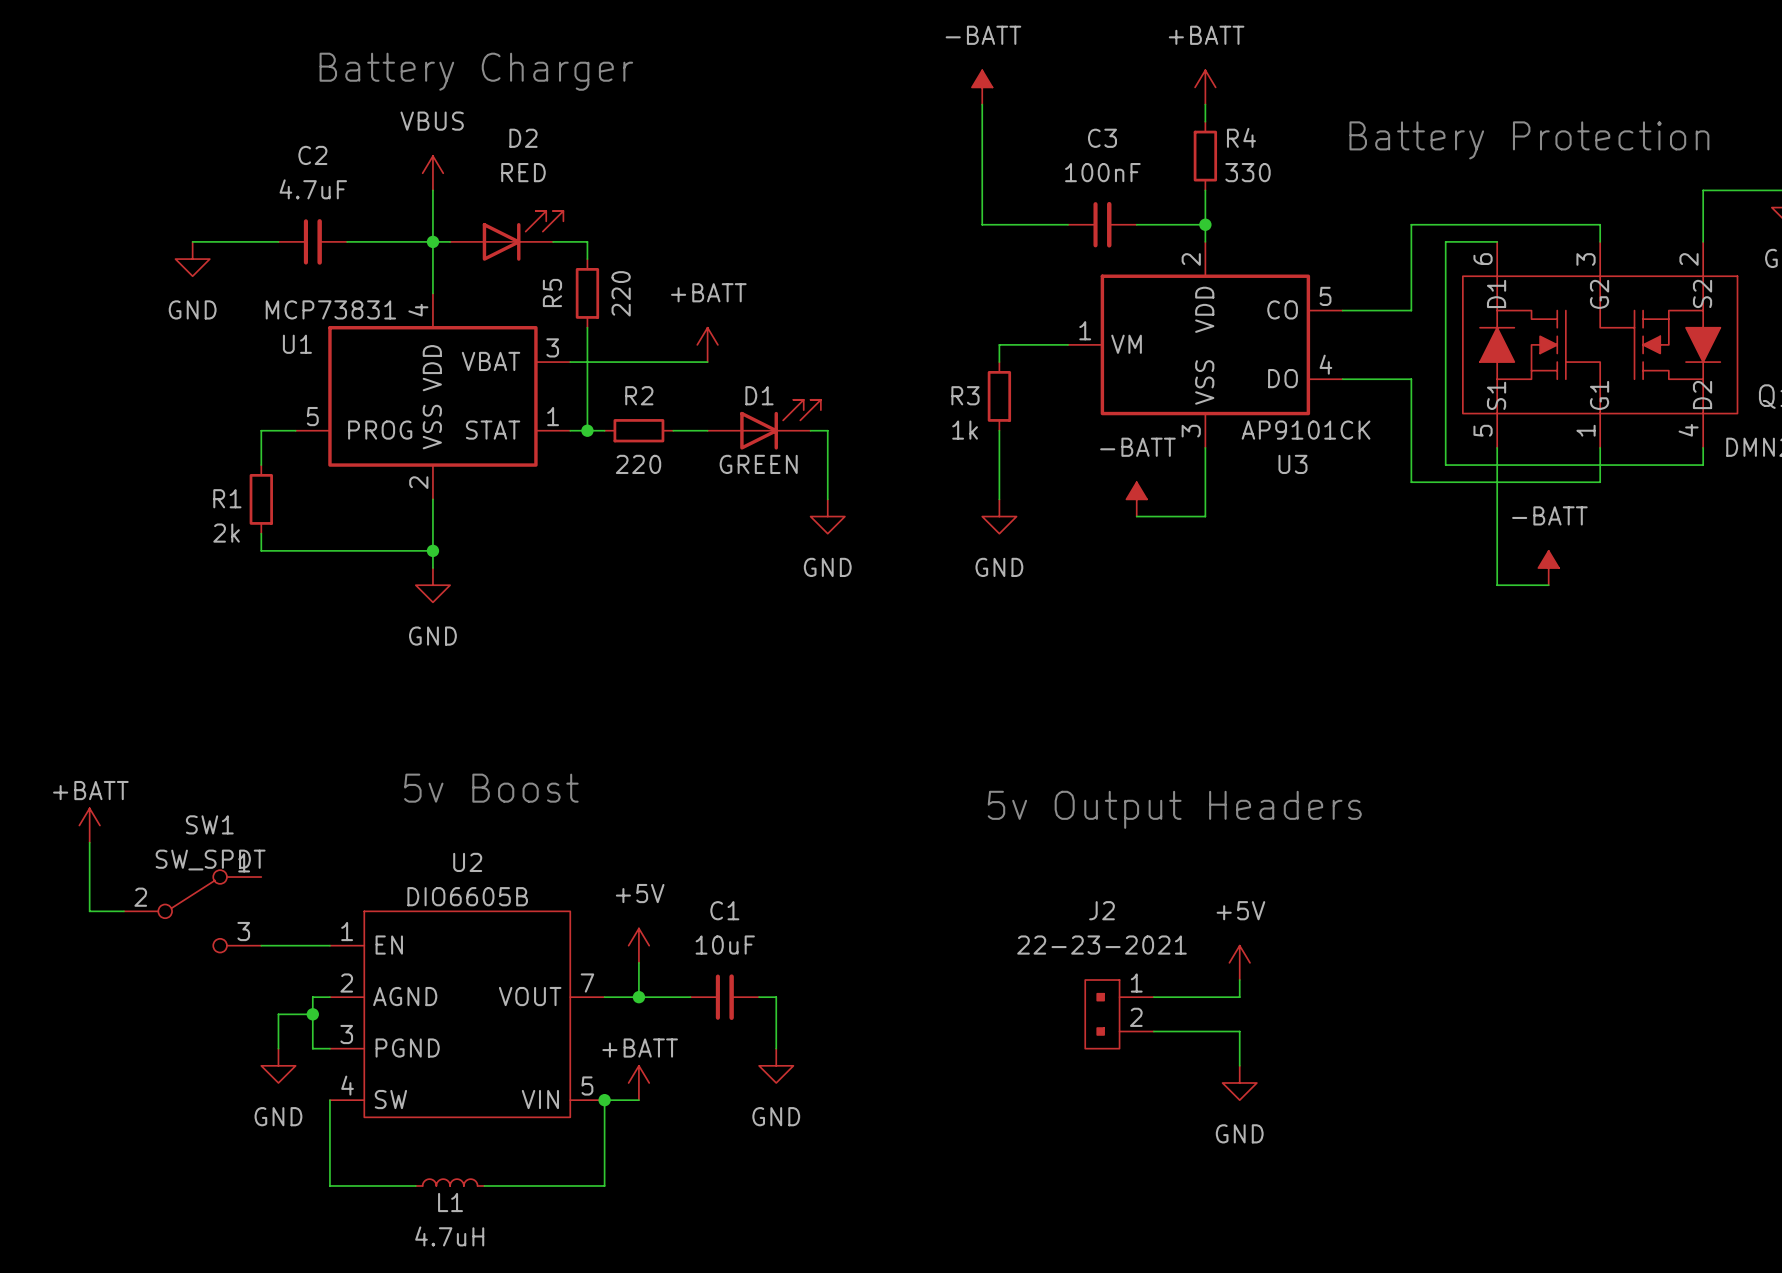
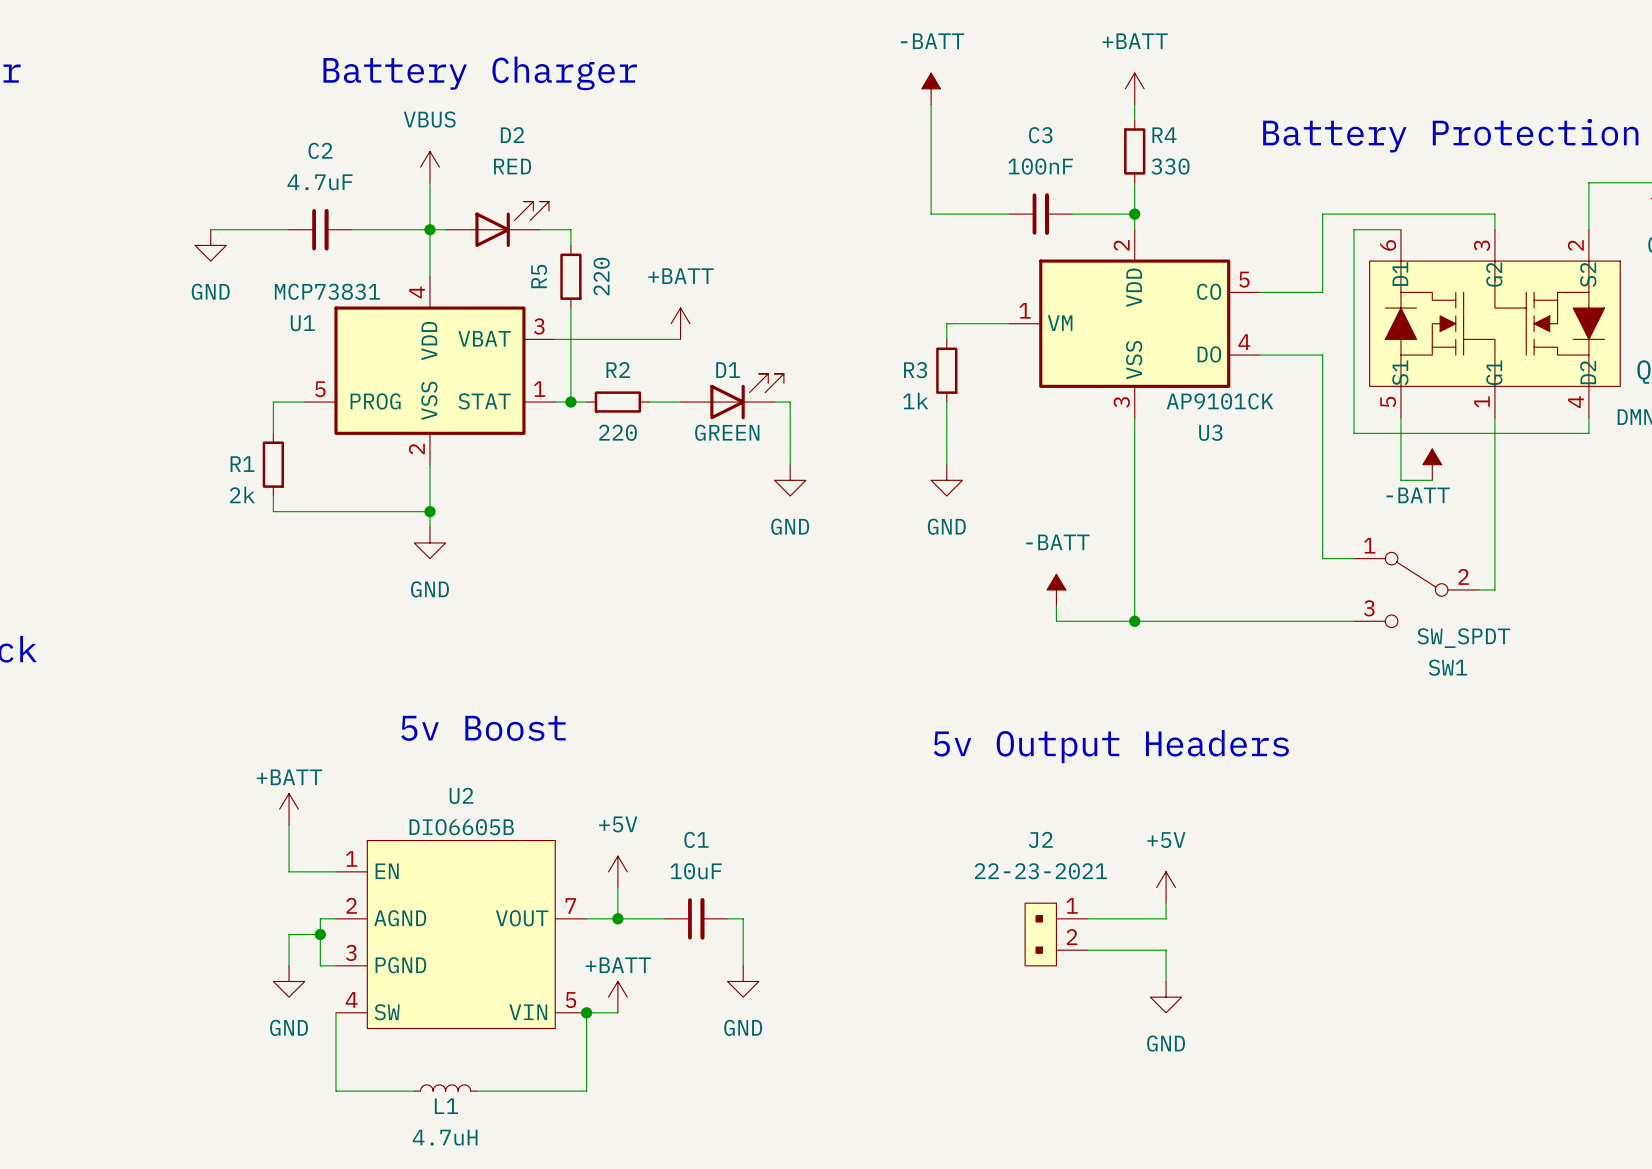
wire: (1411, 482) (1600, 482) -> (1322, 449) (1322, 558) (1353, 558)
wire: none -> (1494, 449) (1494, 589) (1479, 589)
power symbol position: -BATT (1136, 499) -> -BATT (1056, 589)
power symbol text position: -BATT (1549, 515) -> -BATT (1418, 495)
wire: (1136, 516) (1205, 516) -> (1134, 621) (1134, 480)
wire: (1497, 516) (1497, 585) (1548, 585) -> (1400, 480) (1432, 480)
power symbol position: -BATT (1548, 568) -> -BATT (1432, 464)
wire: none -> (1056, 605) (1056, 621) (1353, 621)
junction: none -> (1134, 621)
SW1 name position: SW1 (209, 824) -> SW1 (1447, 667)
power symbol position: +BATT (89, 825) -> +BATT (289, 809)
wire: (89, 842) (89, 911) (123, 911) -> none
SW1 value position: SW_SPDT (210, 860) -> SW_SPDT (1463, 638)
SW1 flip: as is (192, 911) -> left-right (1416, 589)
SW1 position: (192, 911) -> (1416, 589)
wire: (261, 945) (278, 945) -> (289, 824) (289, 871)

